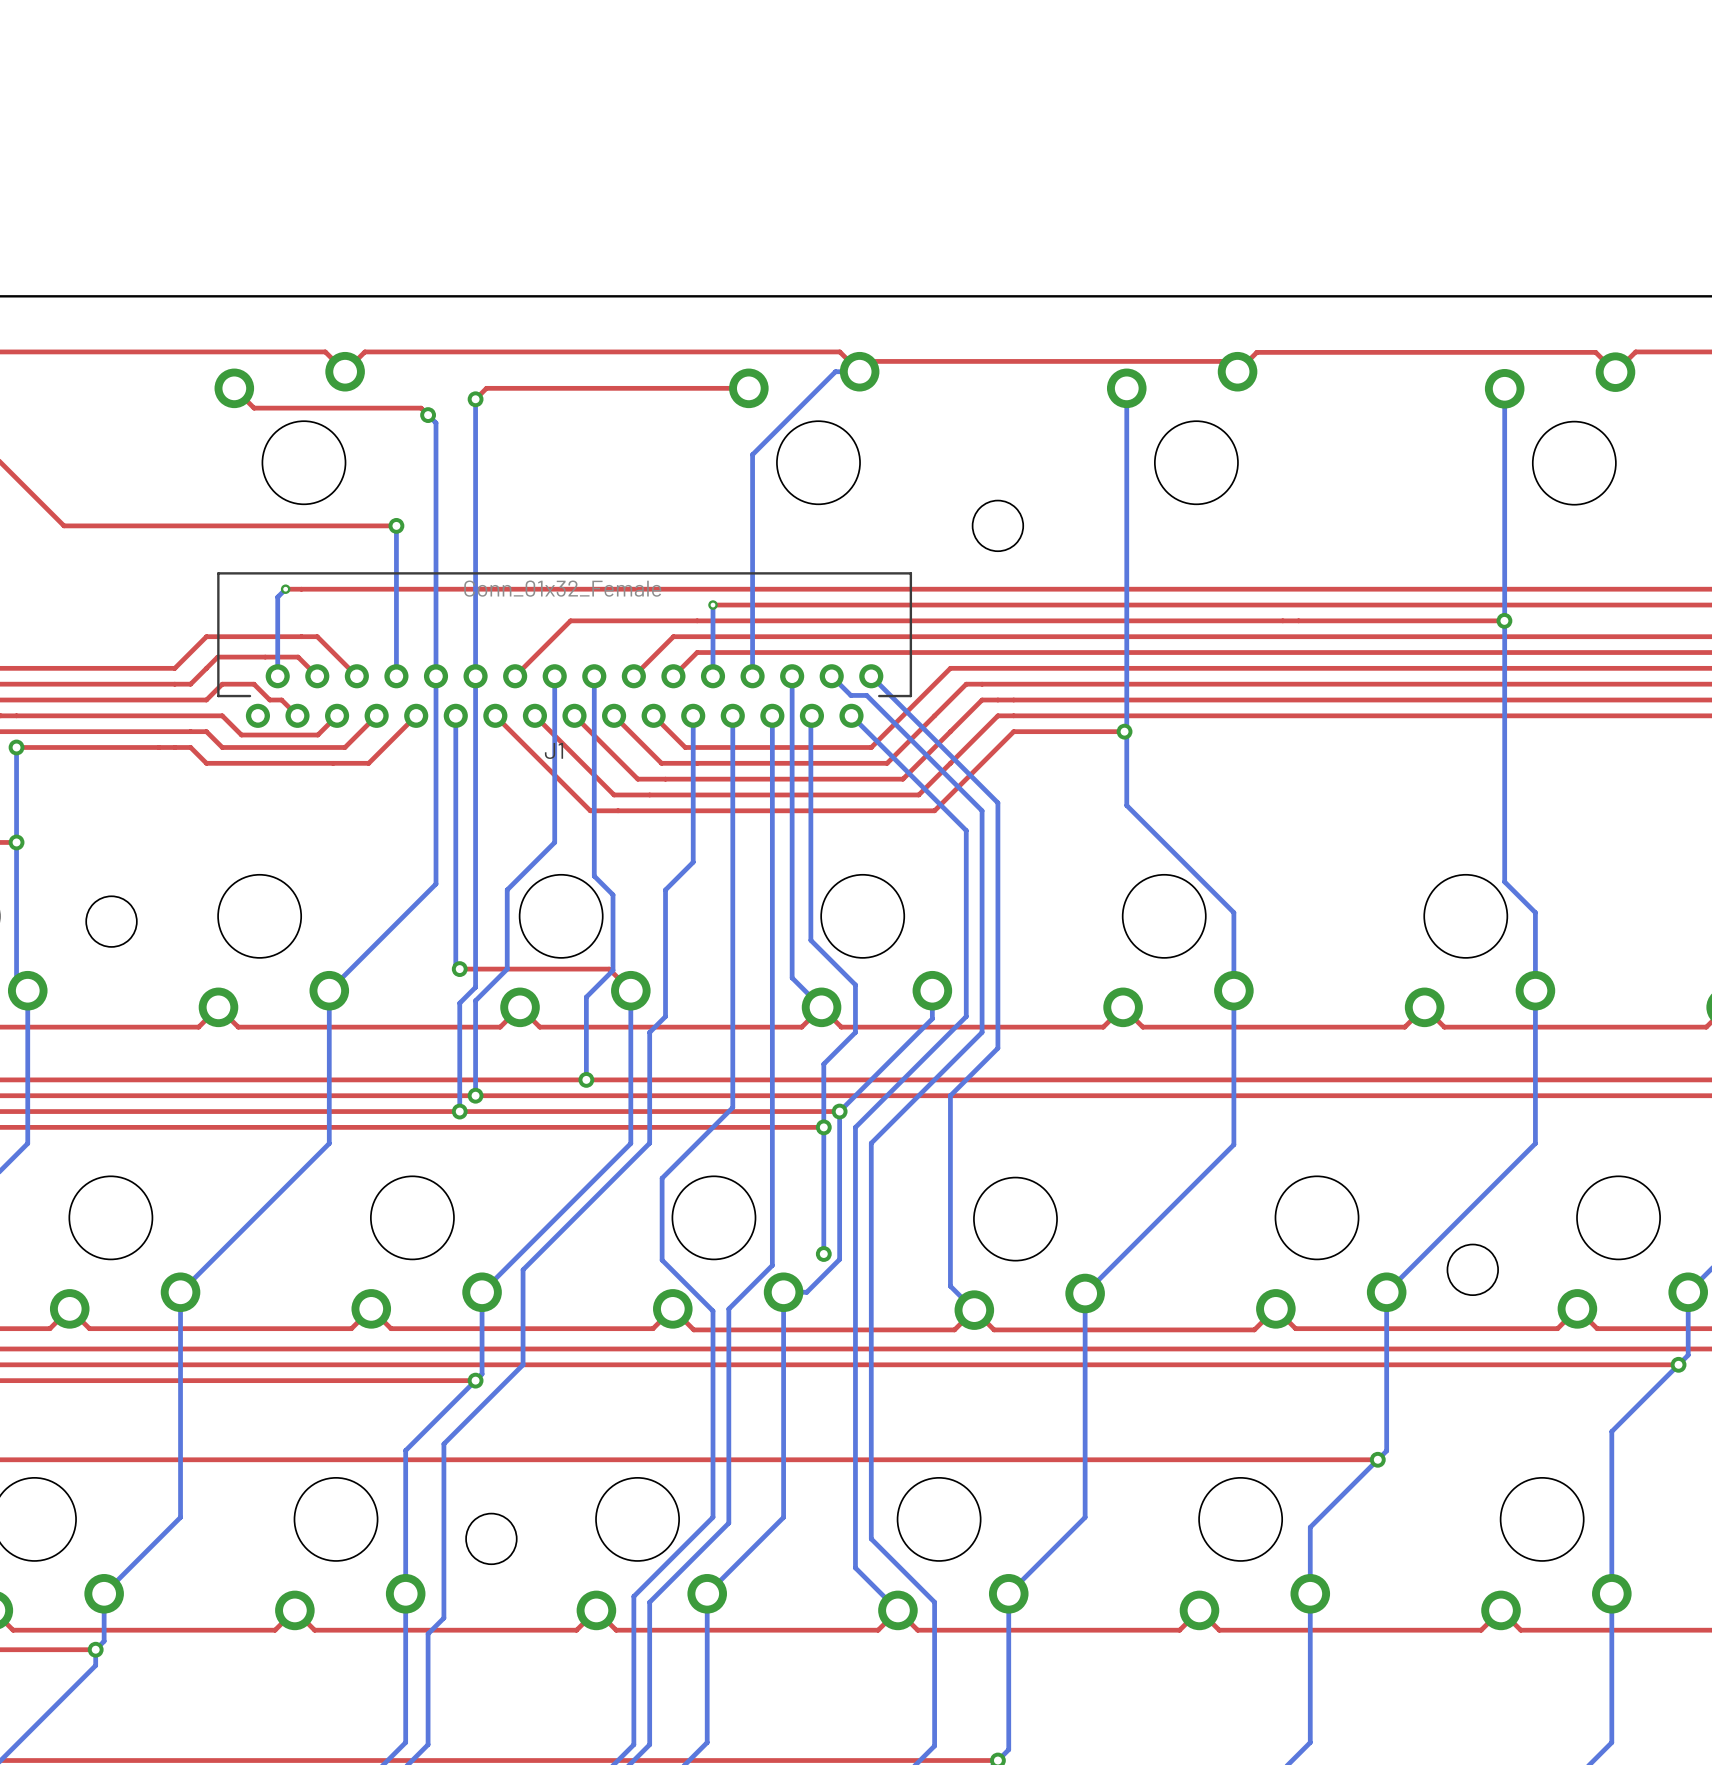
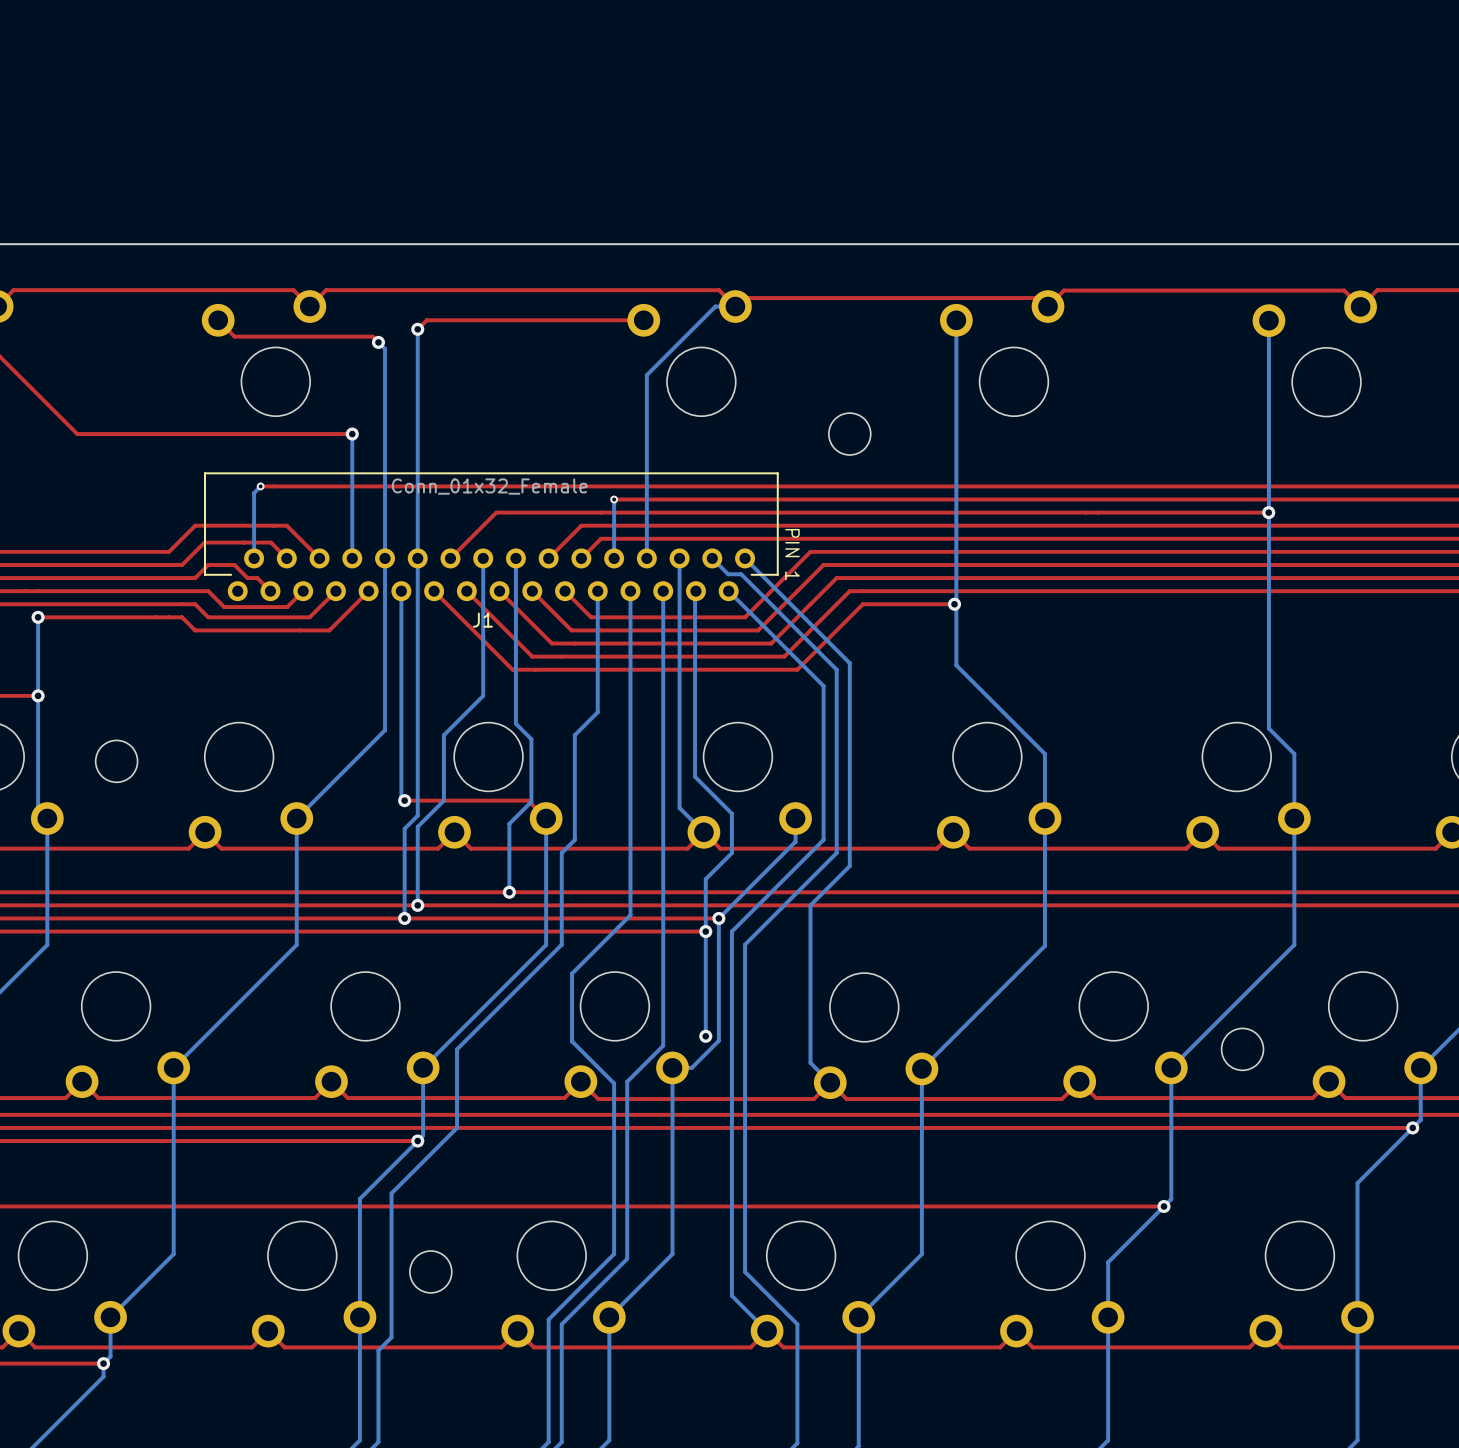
text: none -> PIN 1 (792, 554)

